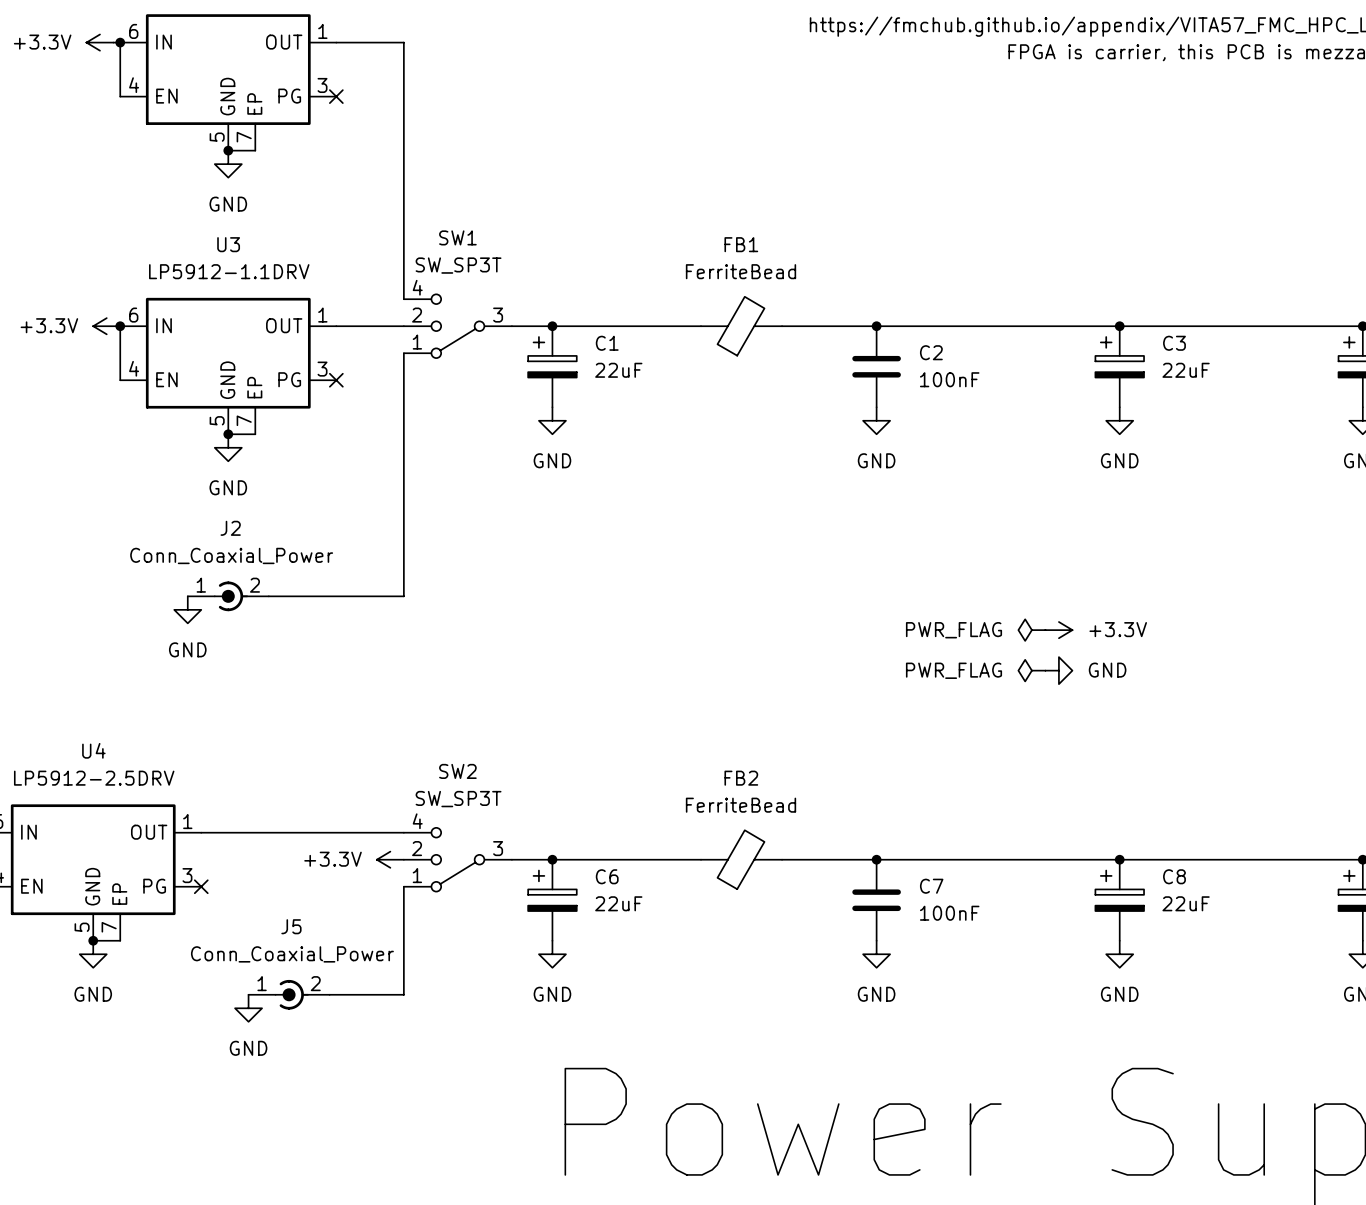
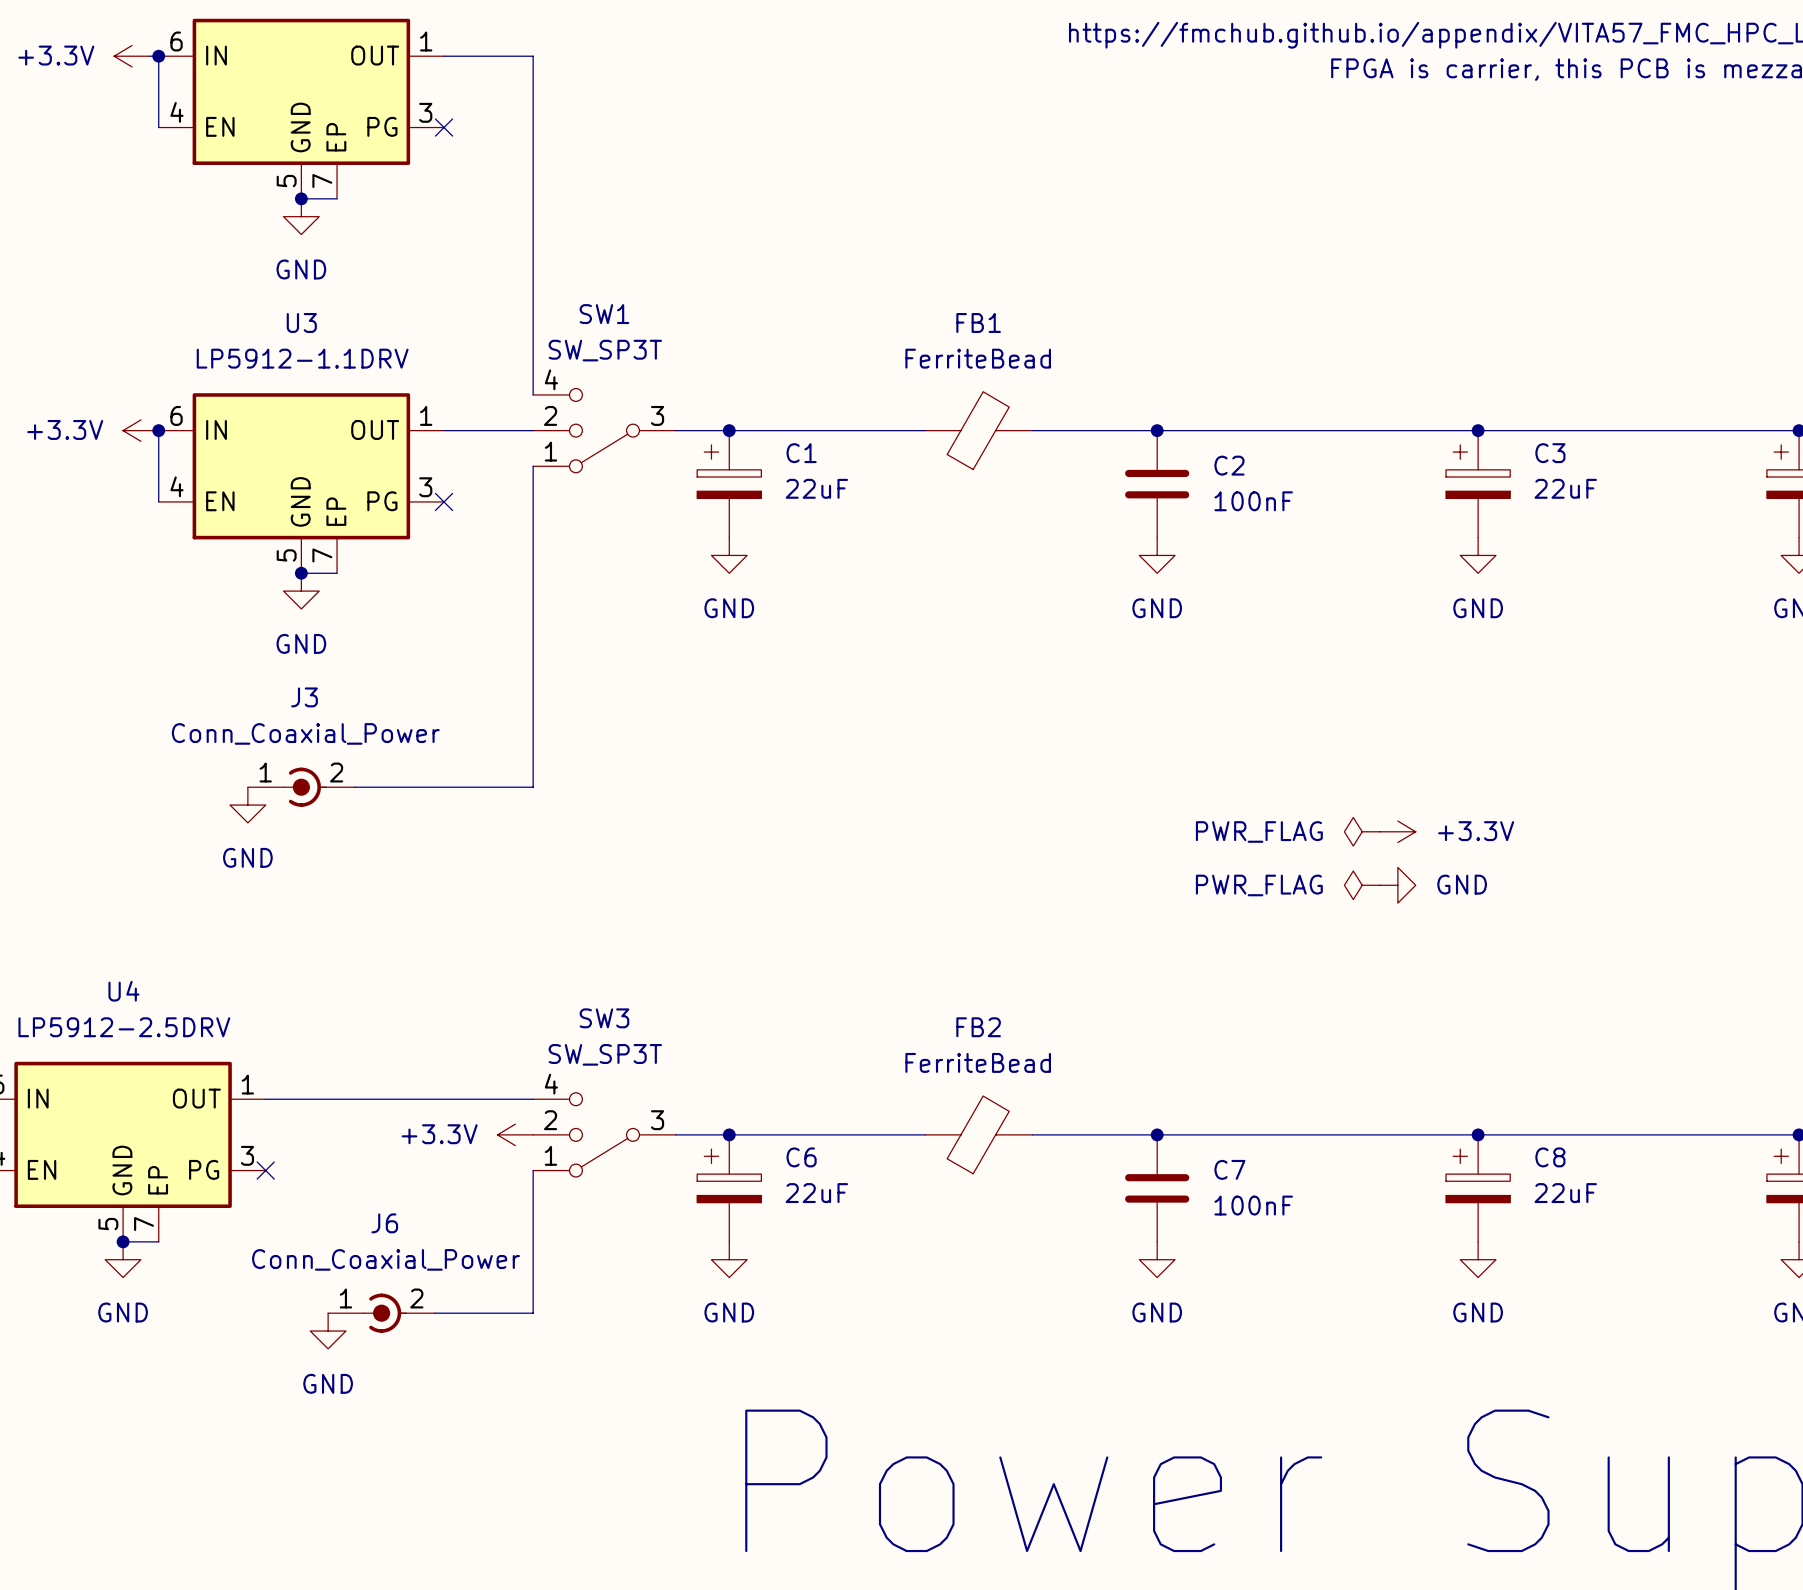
J2 name: J2 (230, 528) -> J3 (304, 697)
SW2 name: SW2 (457, 771) -> SW3 (604, 1018)
J5 name: J5 (291, 926) -> J6 (384, 1223)

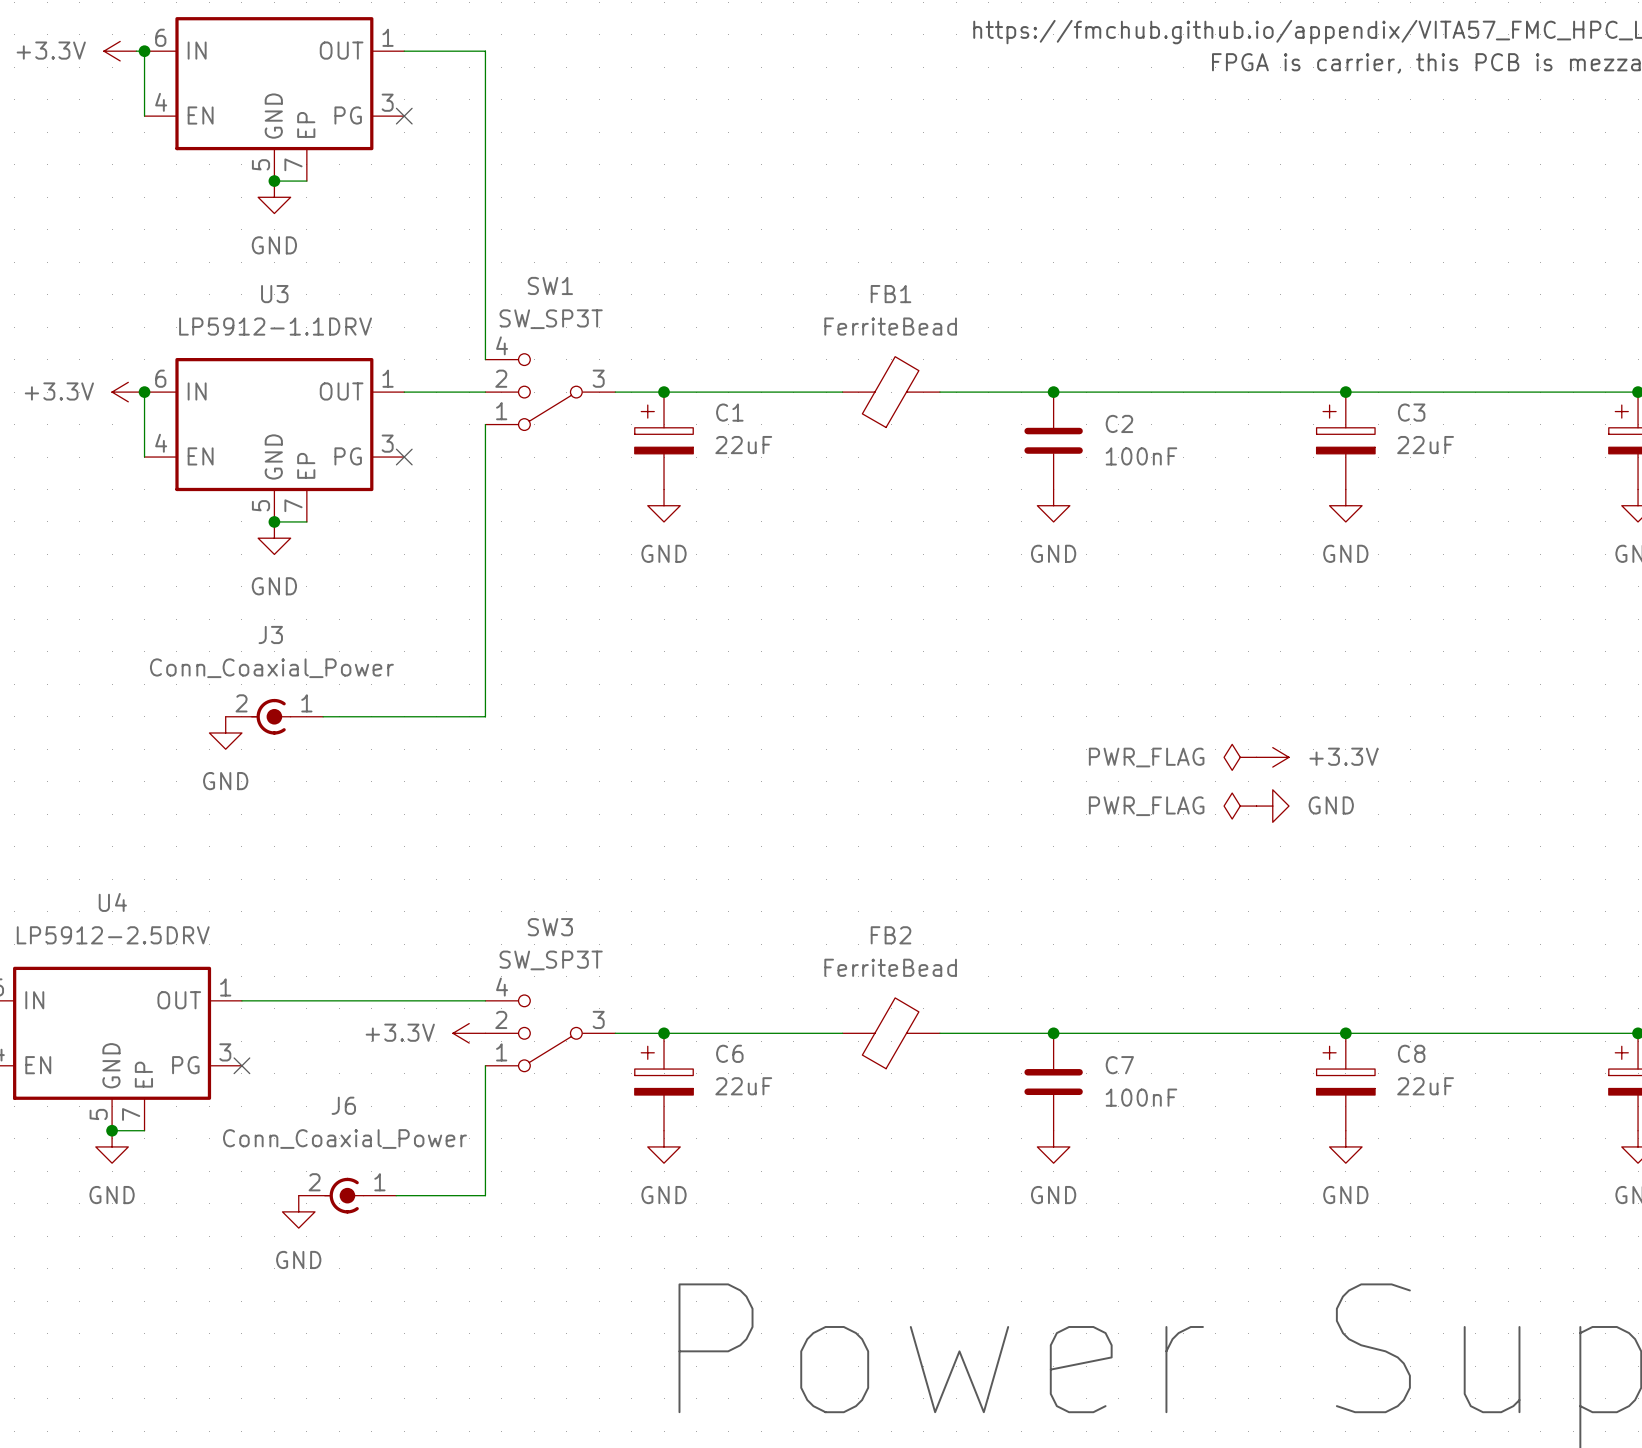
J3 rotation: 0° (304, 787) -> 180° (271, 716)
J6 rotation: 0° (385, 1313) -> 180° (344, 1195)

